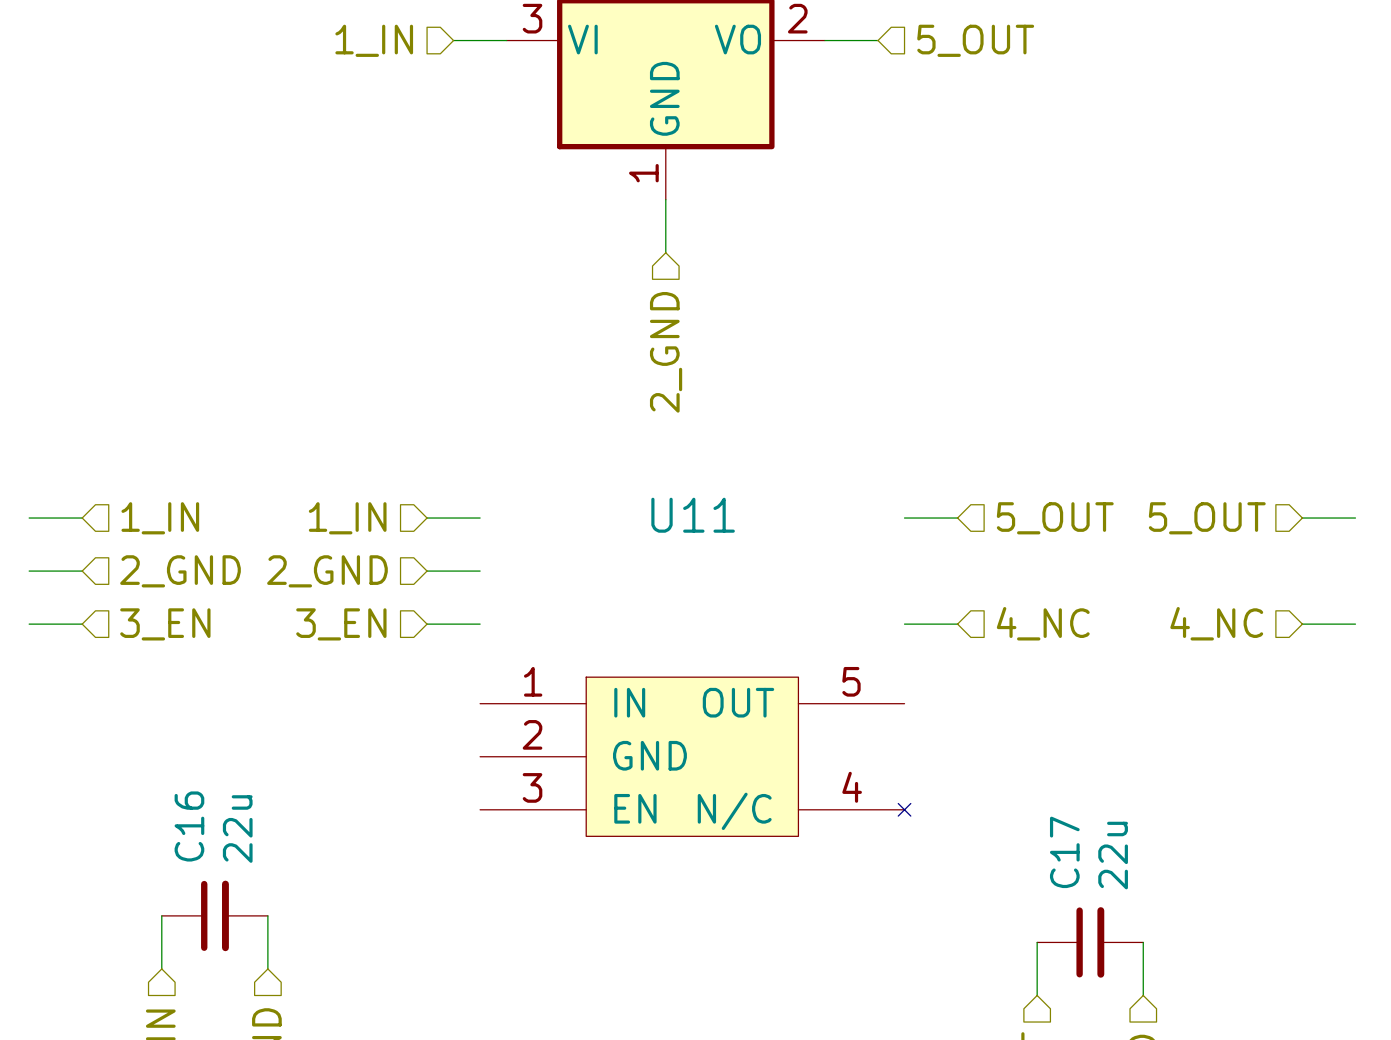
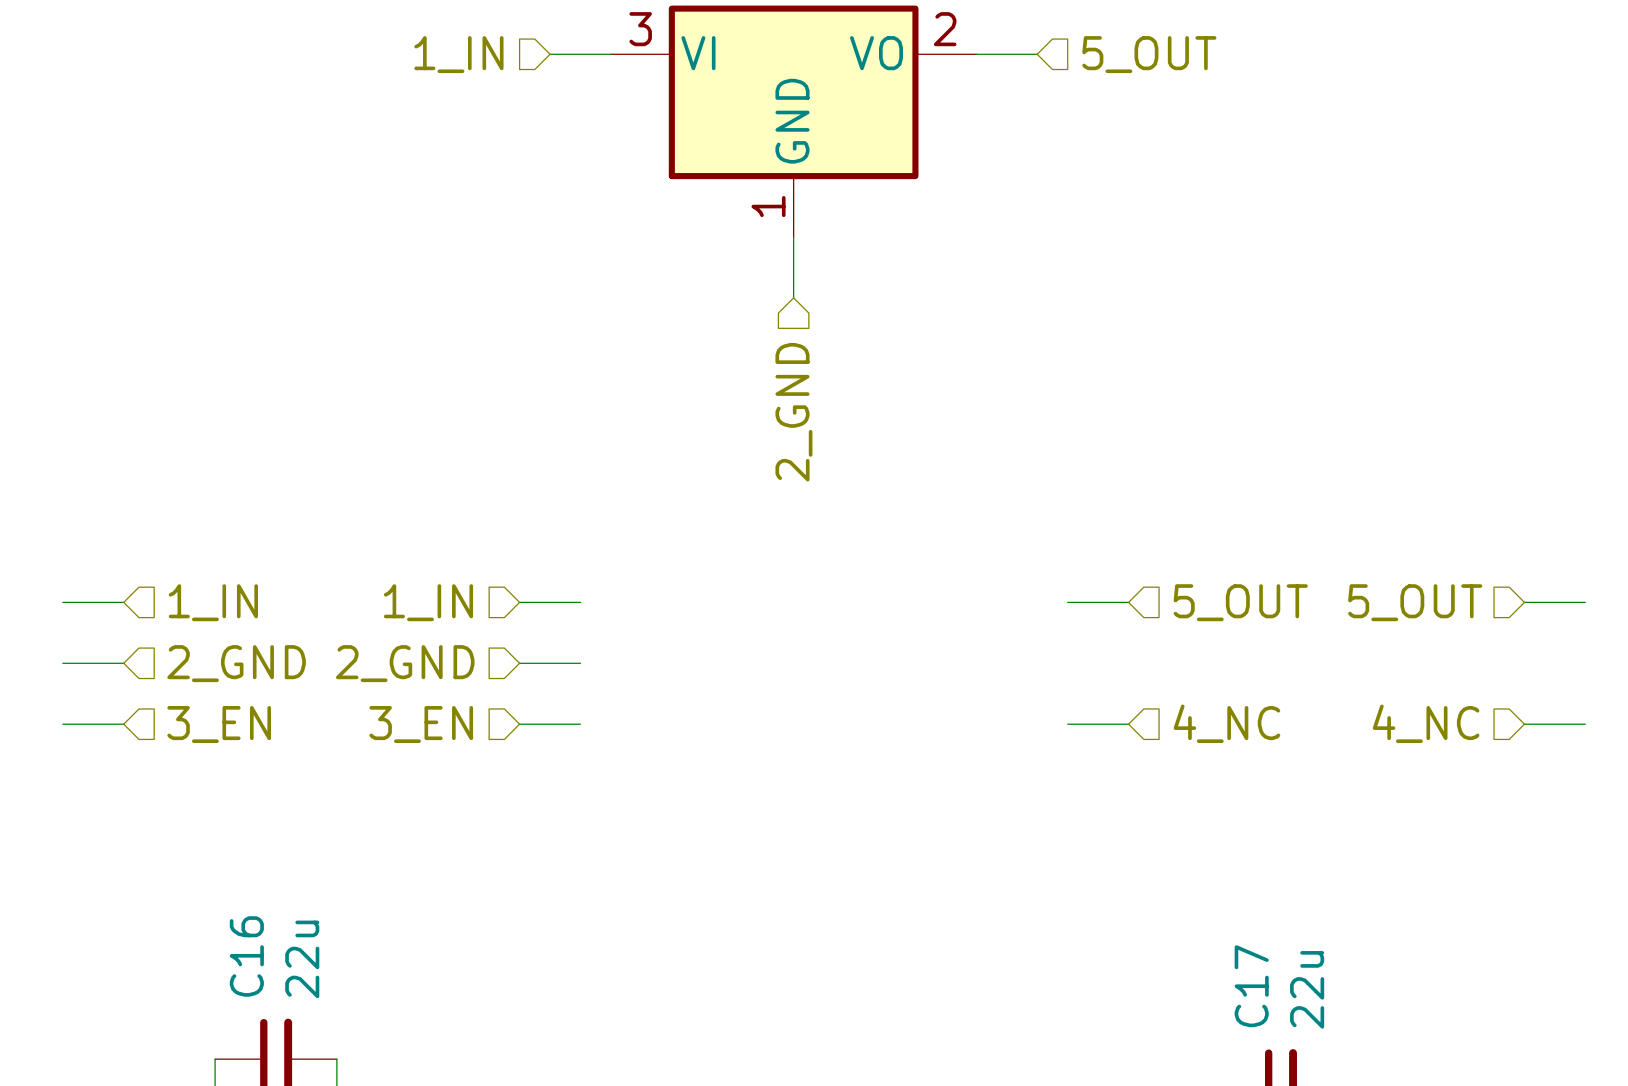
U11: (695, 756) -> none

